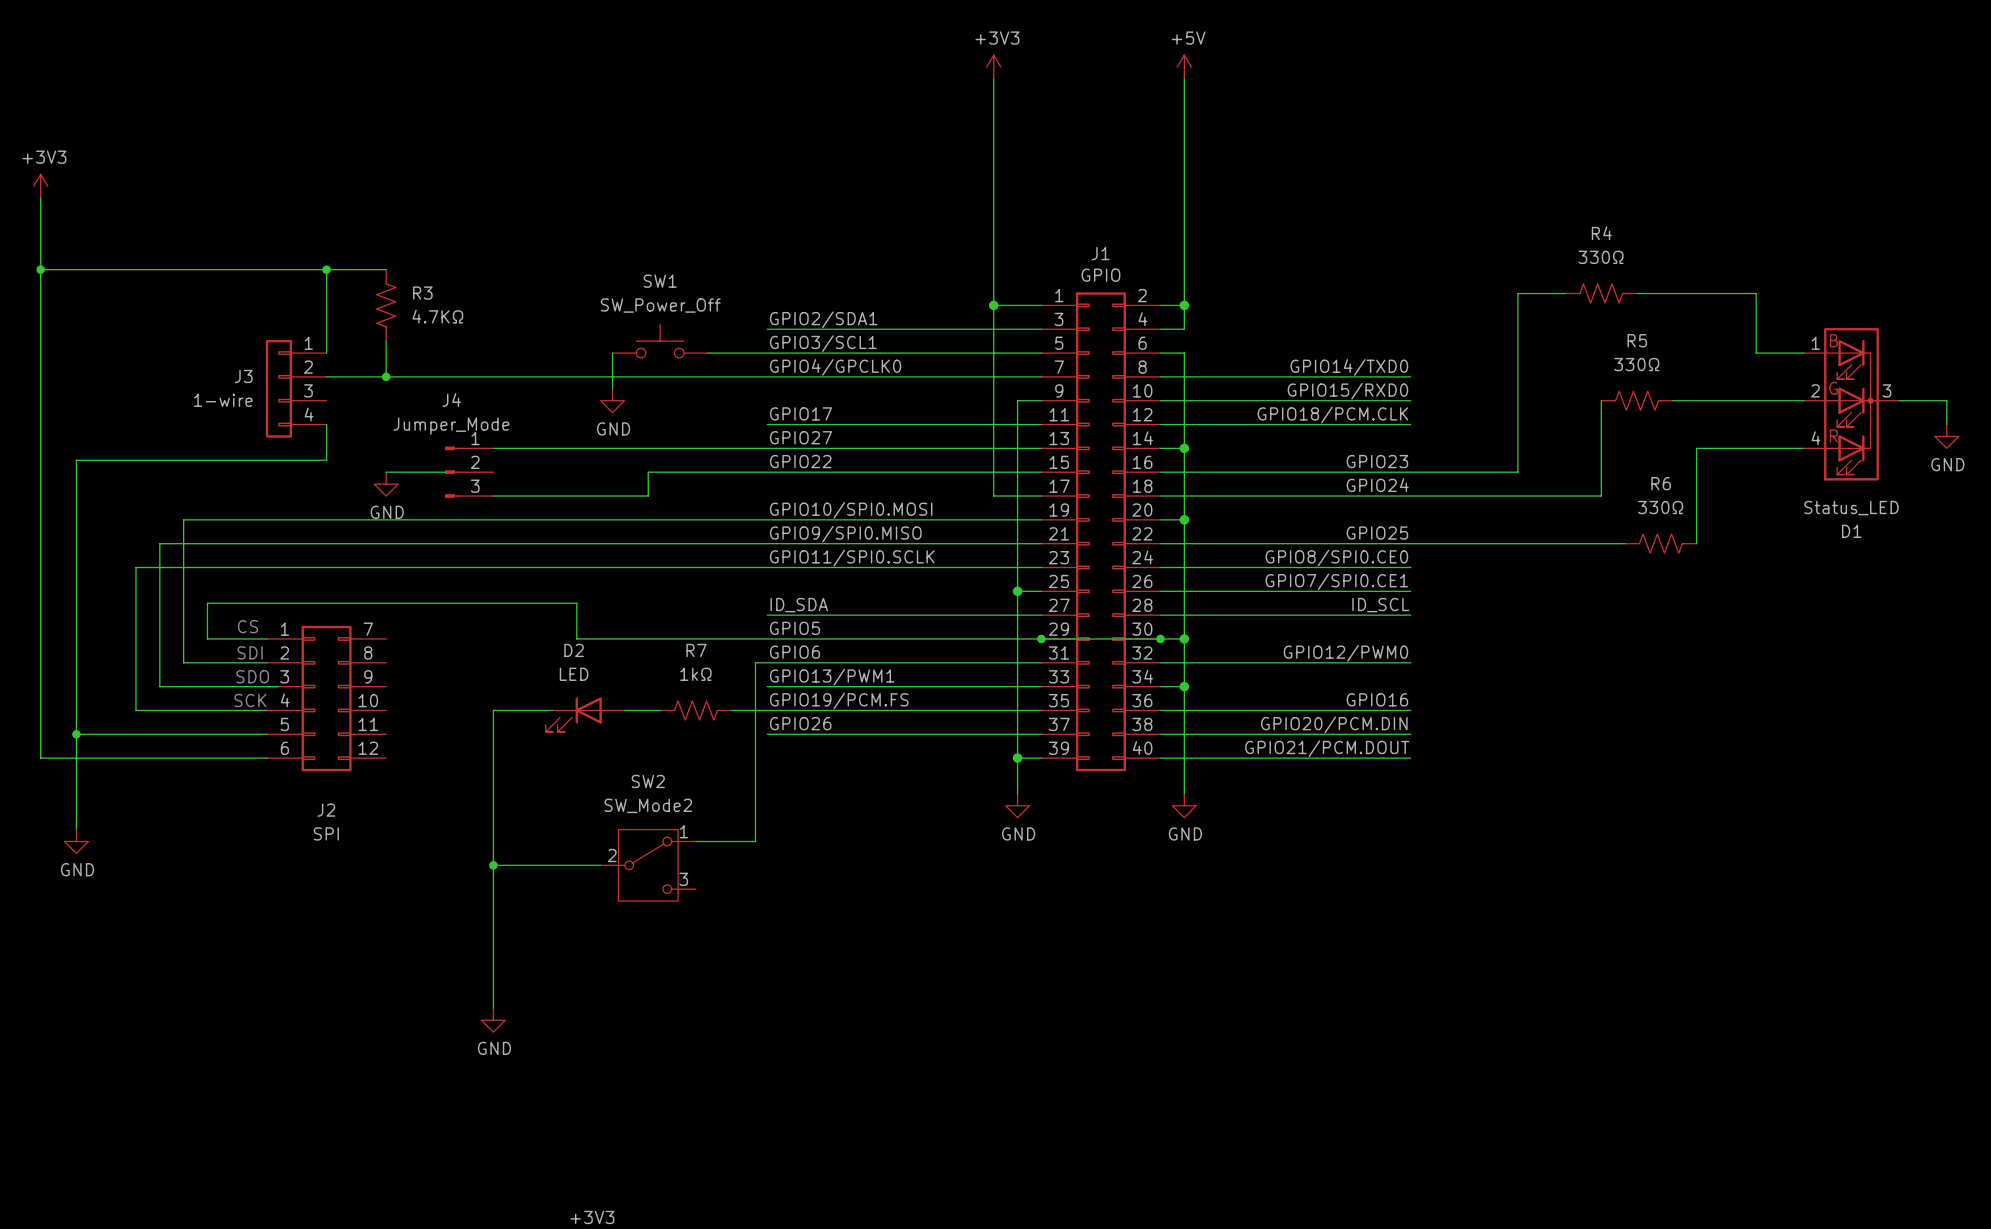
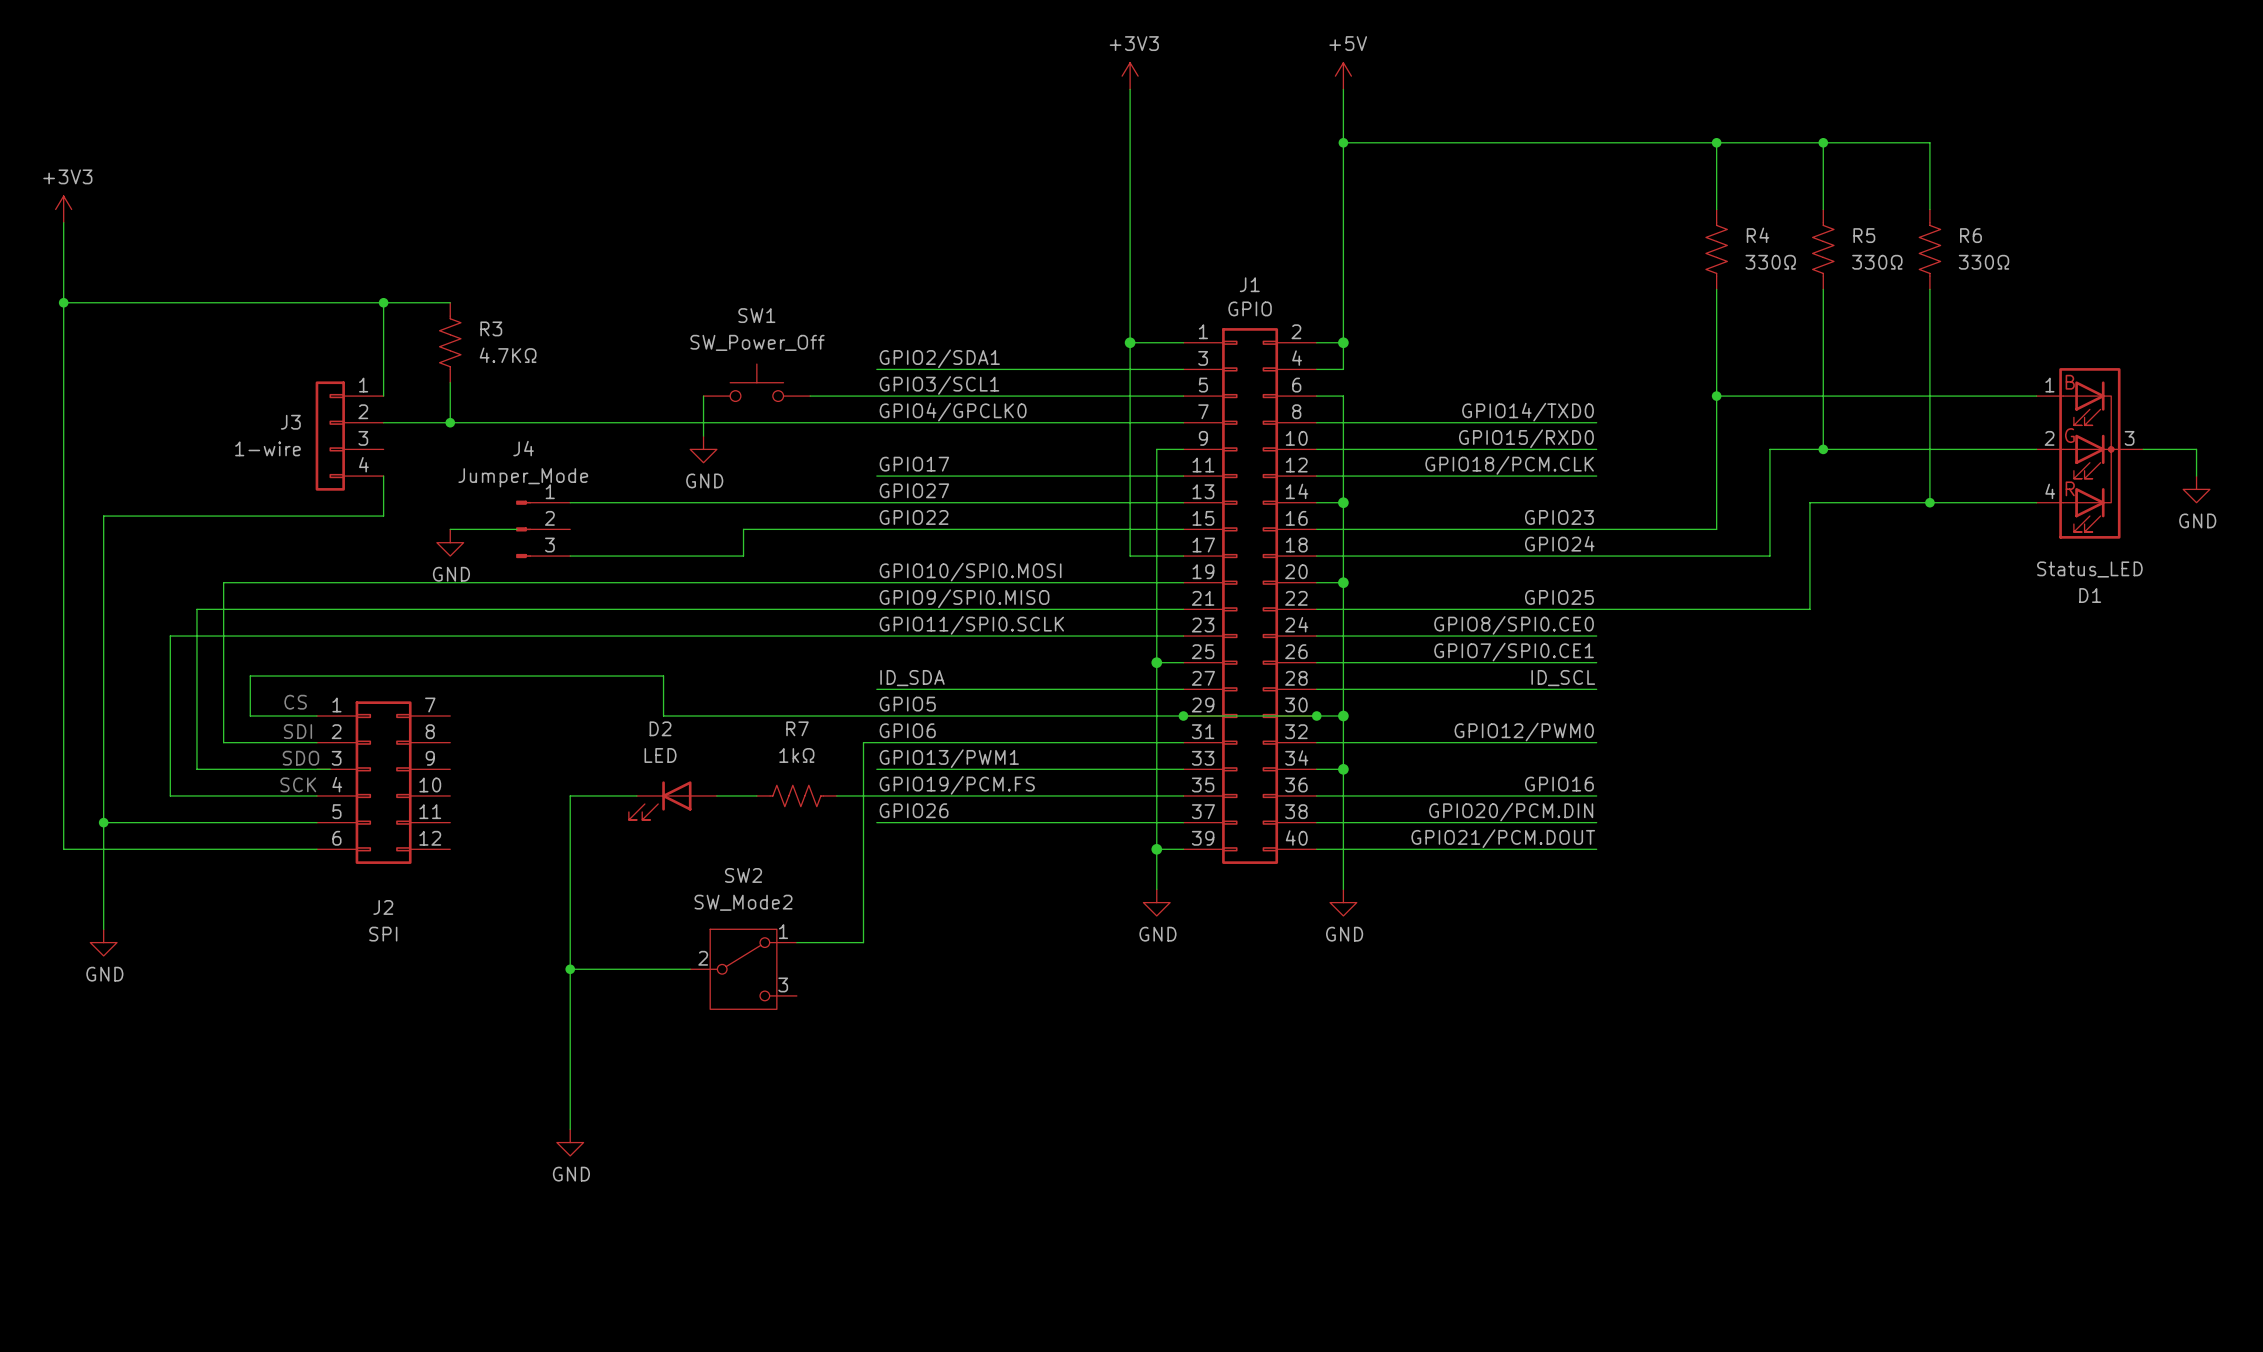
wire: none -> (1343, 142) (1929, 142) (1929, 209)
junction: none -> (1343, 142)
wire: none -> (1716, 142) (1716, 209)
junction: none -> (1716, 142)
wire: none -> (1823, 142) (1823, 209)
junction: none -> (1823, 142)
R4 name position: R4 (1601, 233) -> R4 (1758, 235)
R4 value position: 330Ω (1601, 257) -> 330Ω (1770, 262)
wire: none -> (1823, 289) (1823, 449)
wire: none -> (1929, 289) (1929, 502)
wire: (1517, 293) (1565, 293) -> (1716, 329) (1716, 289)
R4 rotation: 0° (1601, 293) -> 90° clockwise (1716, 249)
R4 position: (1601, 293) -> (1716, 249)
wire: (1637, 293) (1756, 293) (1756, 353) -> (1716, 396) (1983, 396)
R5 name position: R5 (1637, 340) -> R5 (1864, 235)
junction: none -> (1716, 396)
R5 value position: 330Ω (1636, 364) -> 330Ω (1877, 262)
wire: (1601, 400) (1601, 448) -> (1916, 502) (1809, 502)
junction: none -> (1823, 449)
R5 rotation: 0° (1637, 400) -> 90° clockwise (1823, 249)
R5 position: (1637, 400) -> (1823, 249)
wire: (1696, 448) (1696, 543) -> none
junction: none -> (1929, 502)
R6 name position: R6 (1661, 483) -> R6 (1970, 235)
wire: (1565, 496) (1601, 496) -> (1769, 556) (1769, 449) (1889, 449)
R6 value position: 330Ω (1660, 507) -> 330Ω (1983, 262)
wire: (1601, 543) (1625, 543) -> (1809, 609) (1809, 556)
R6 rotation: 0° (1660, 543) -> 90° clockwise (1929, 249)
R6 position: (1660, 543) -> (1929, 249)

